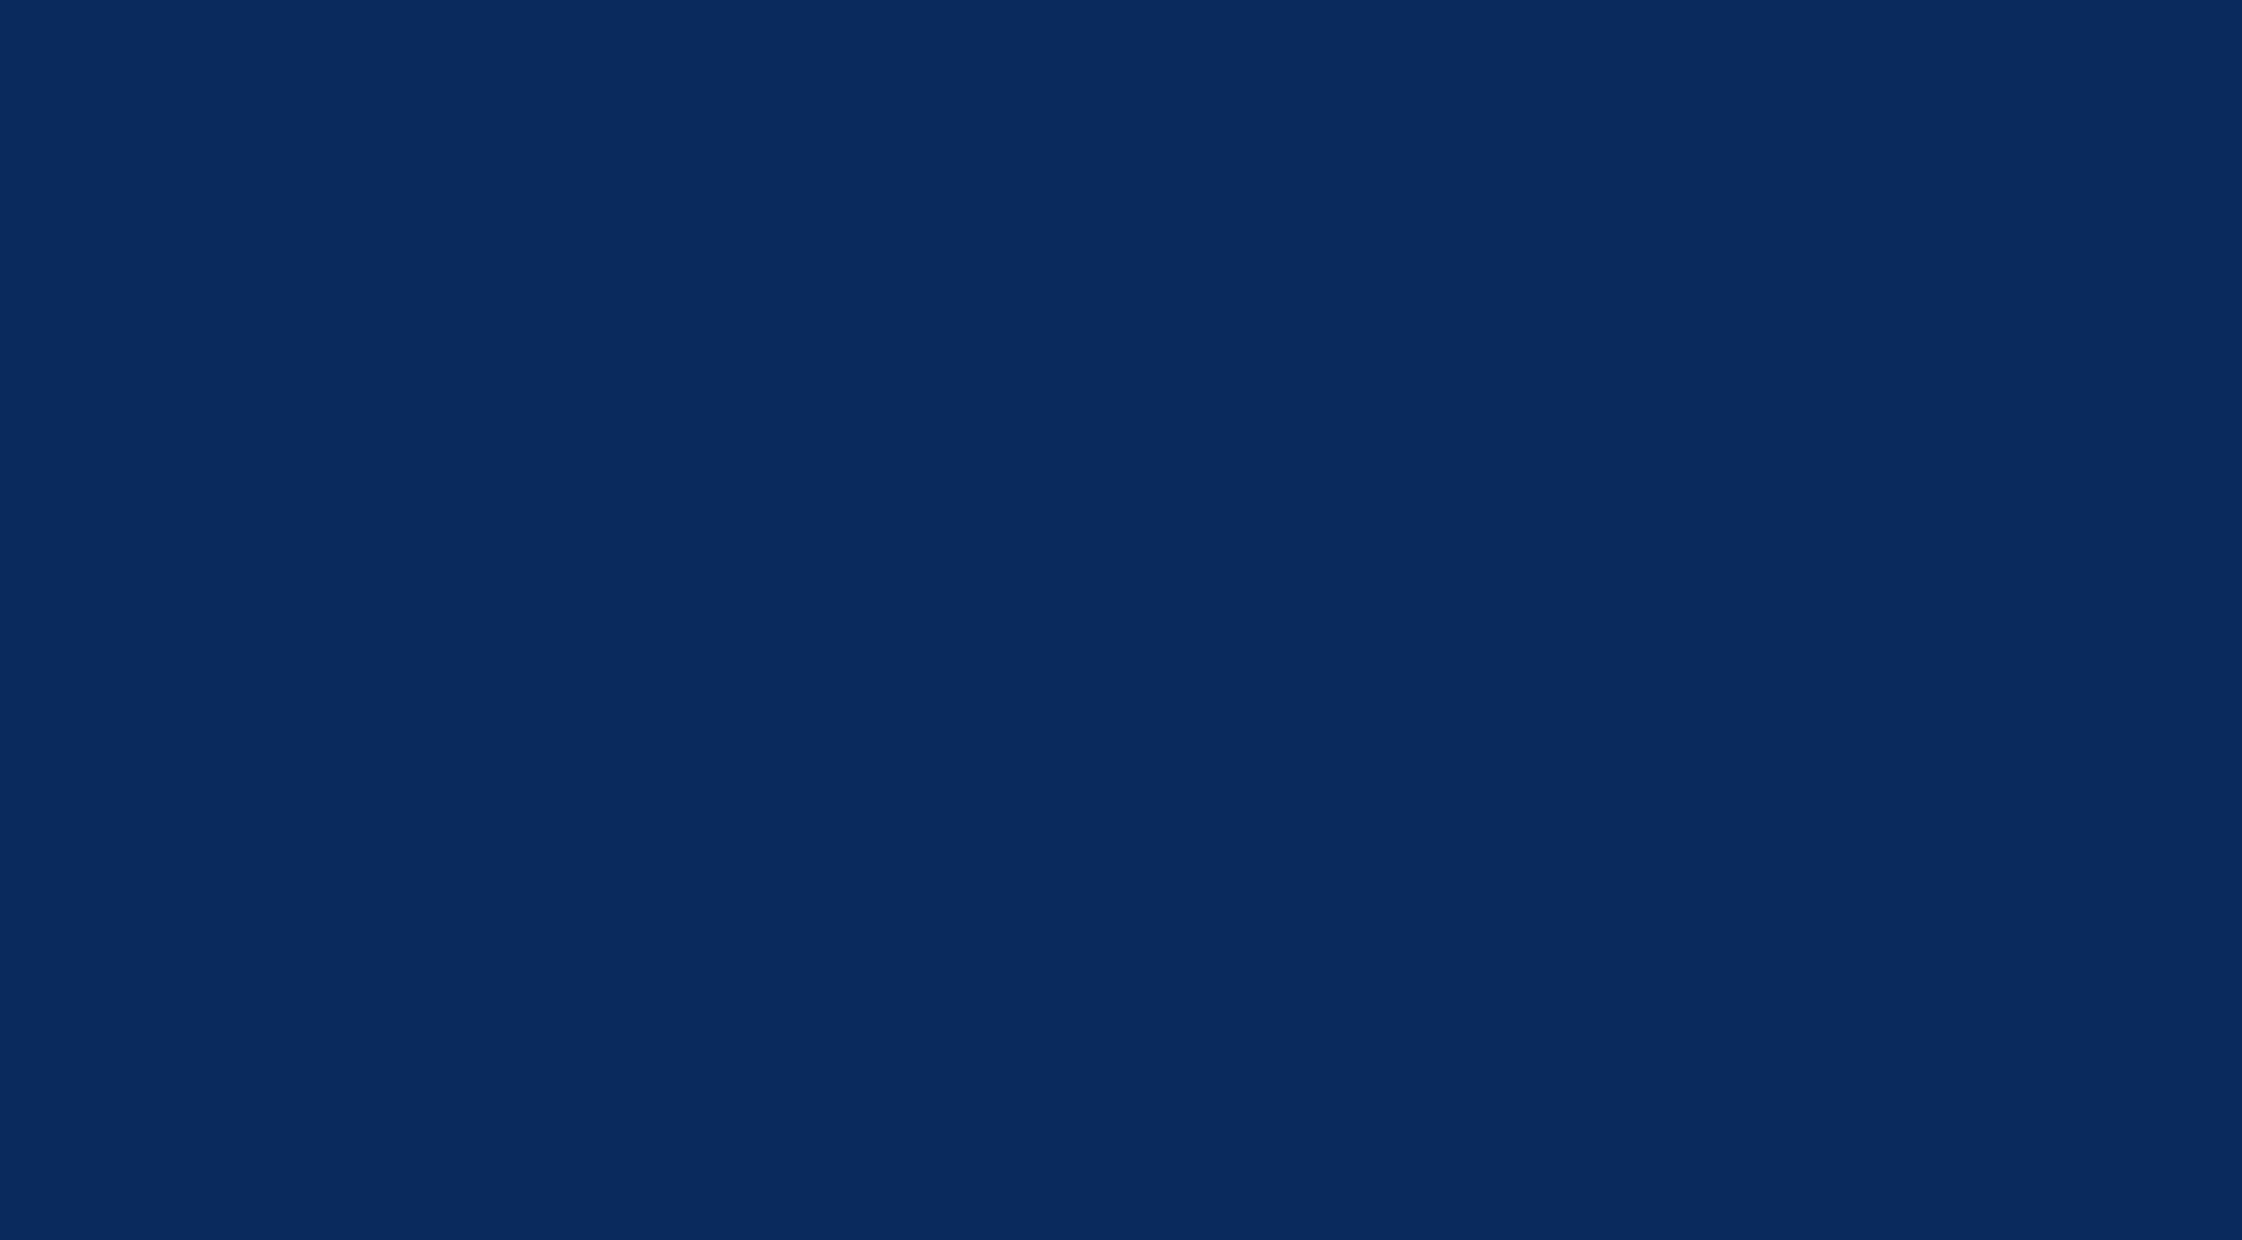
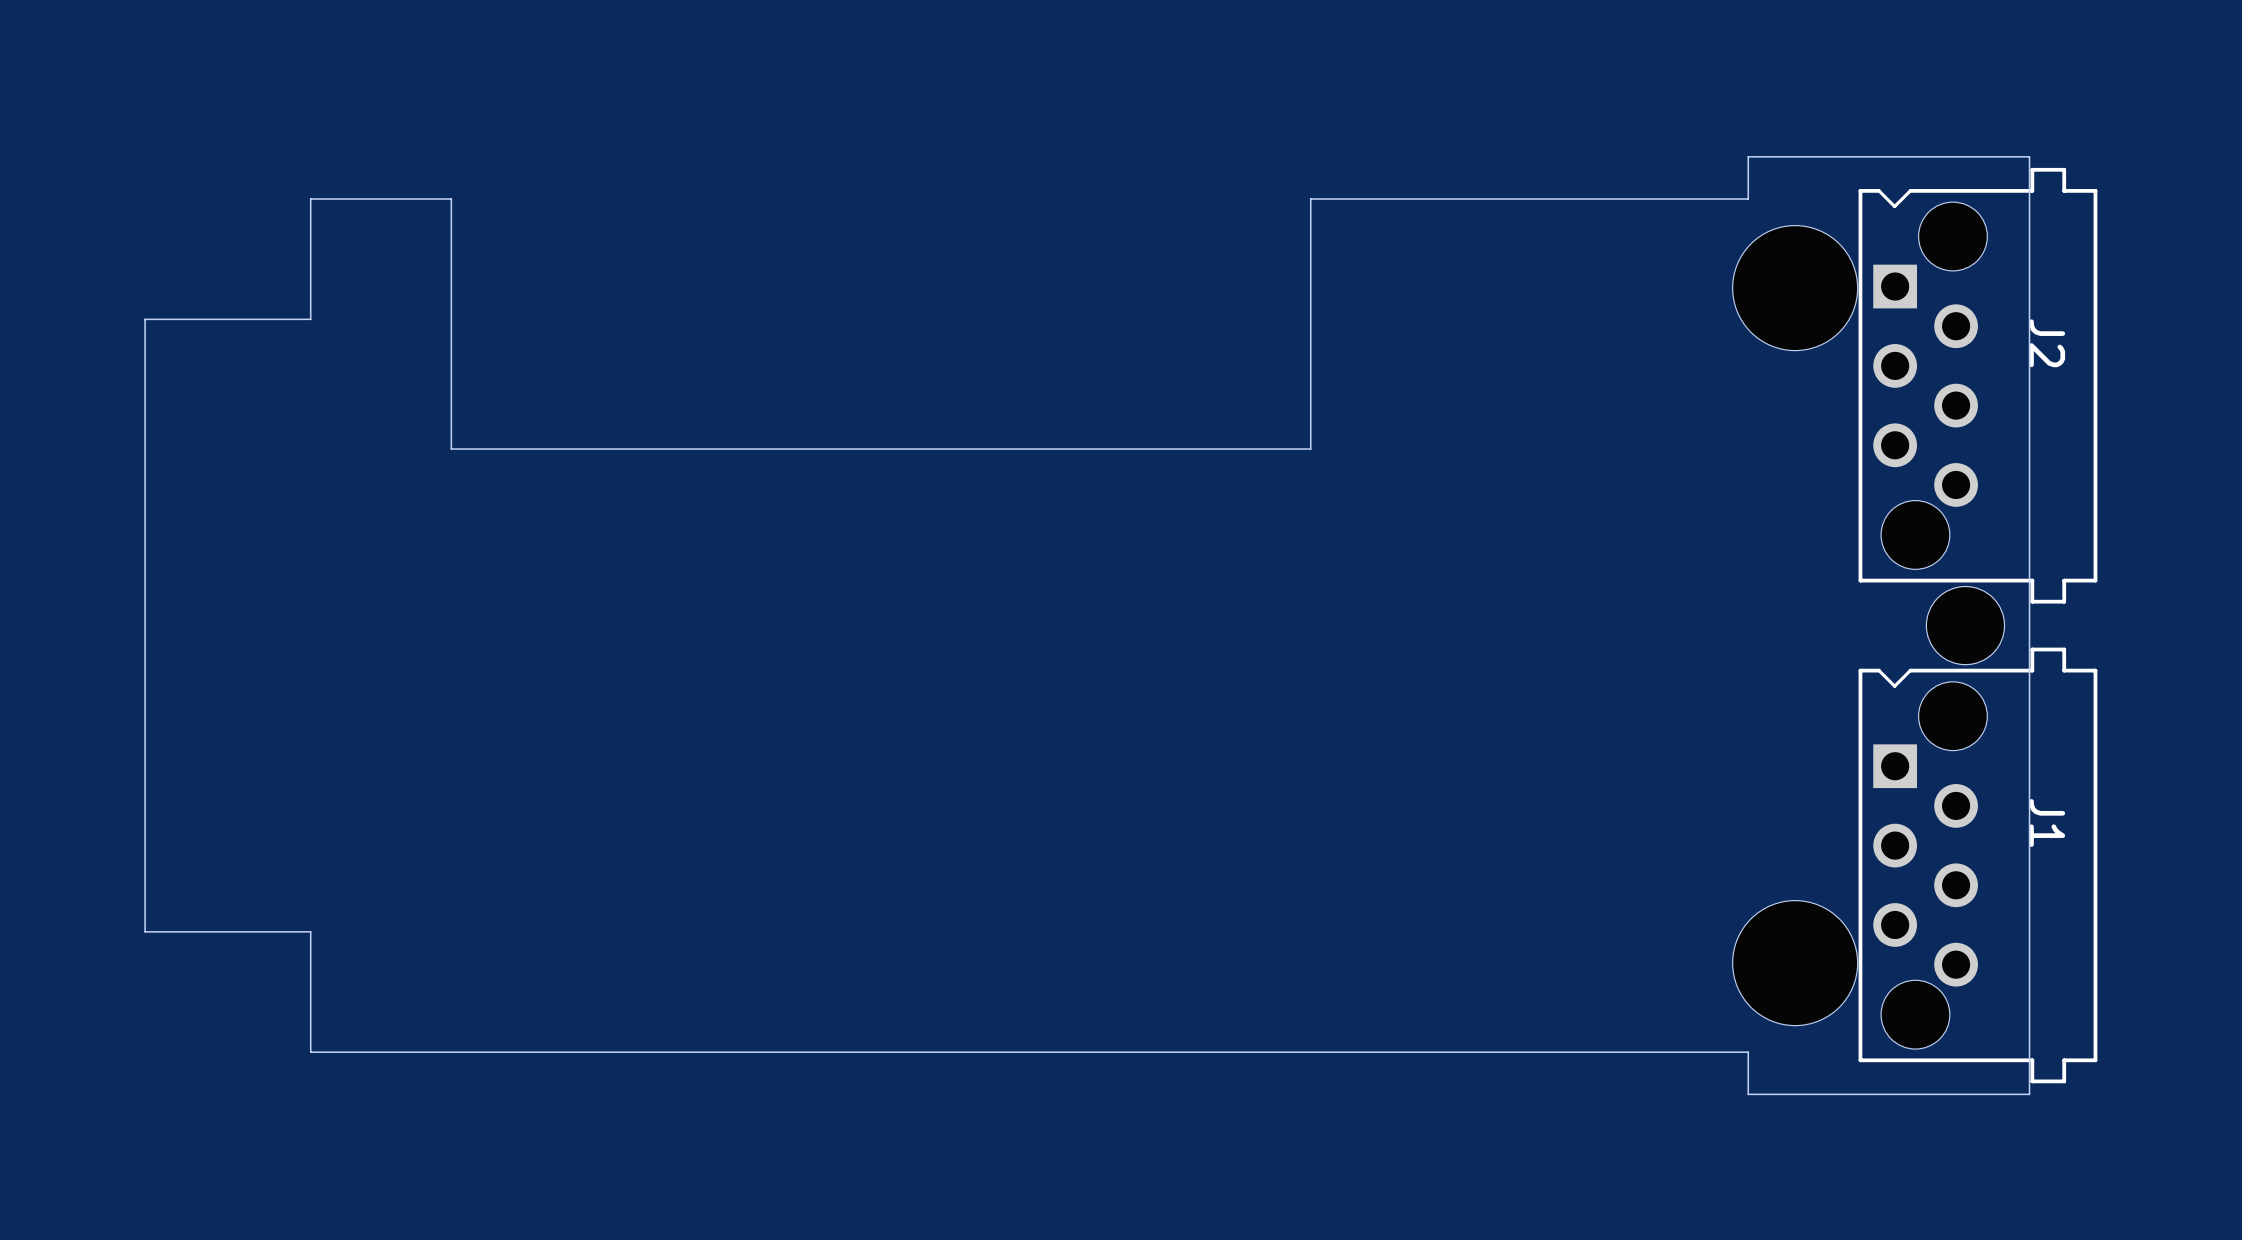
board edge: none -> (2029, 156) (1748, 156) (1748, 199) (1310, 199) (1310, 449) (451, 449) (451, 199) (310, 199) (310, 319) (145, 319) (145, 931) (310, 931) (310, 1052) (1748, 1052) (1748, 1094) (2029, 1094) (2029, 156)
part: none -> (1795, 288)
J2: none -> (1977, 385)
part: none -> (1965, 625)
J1: none -> (1977, 865)
part: none -> (1795, 963)

